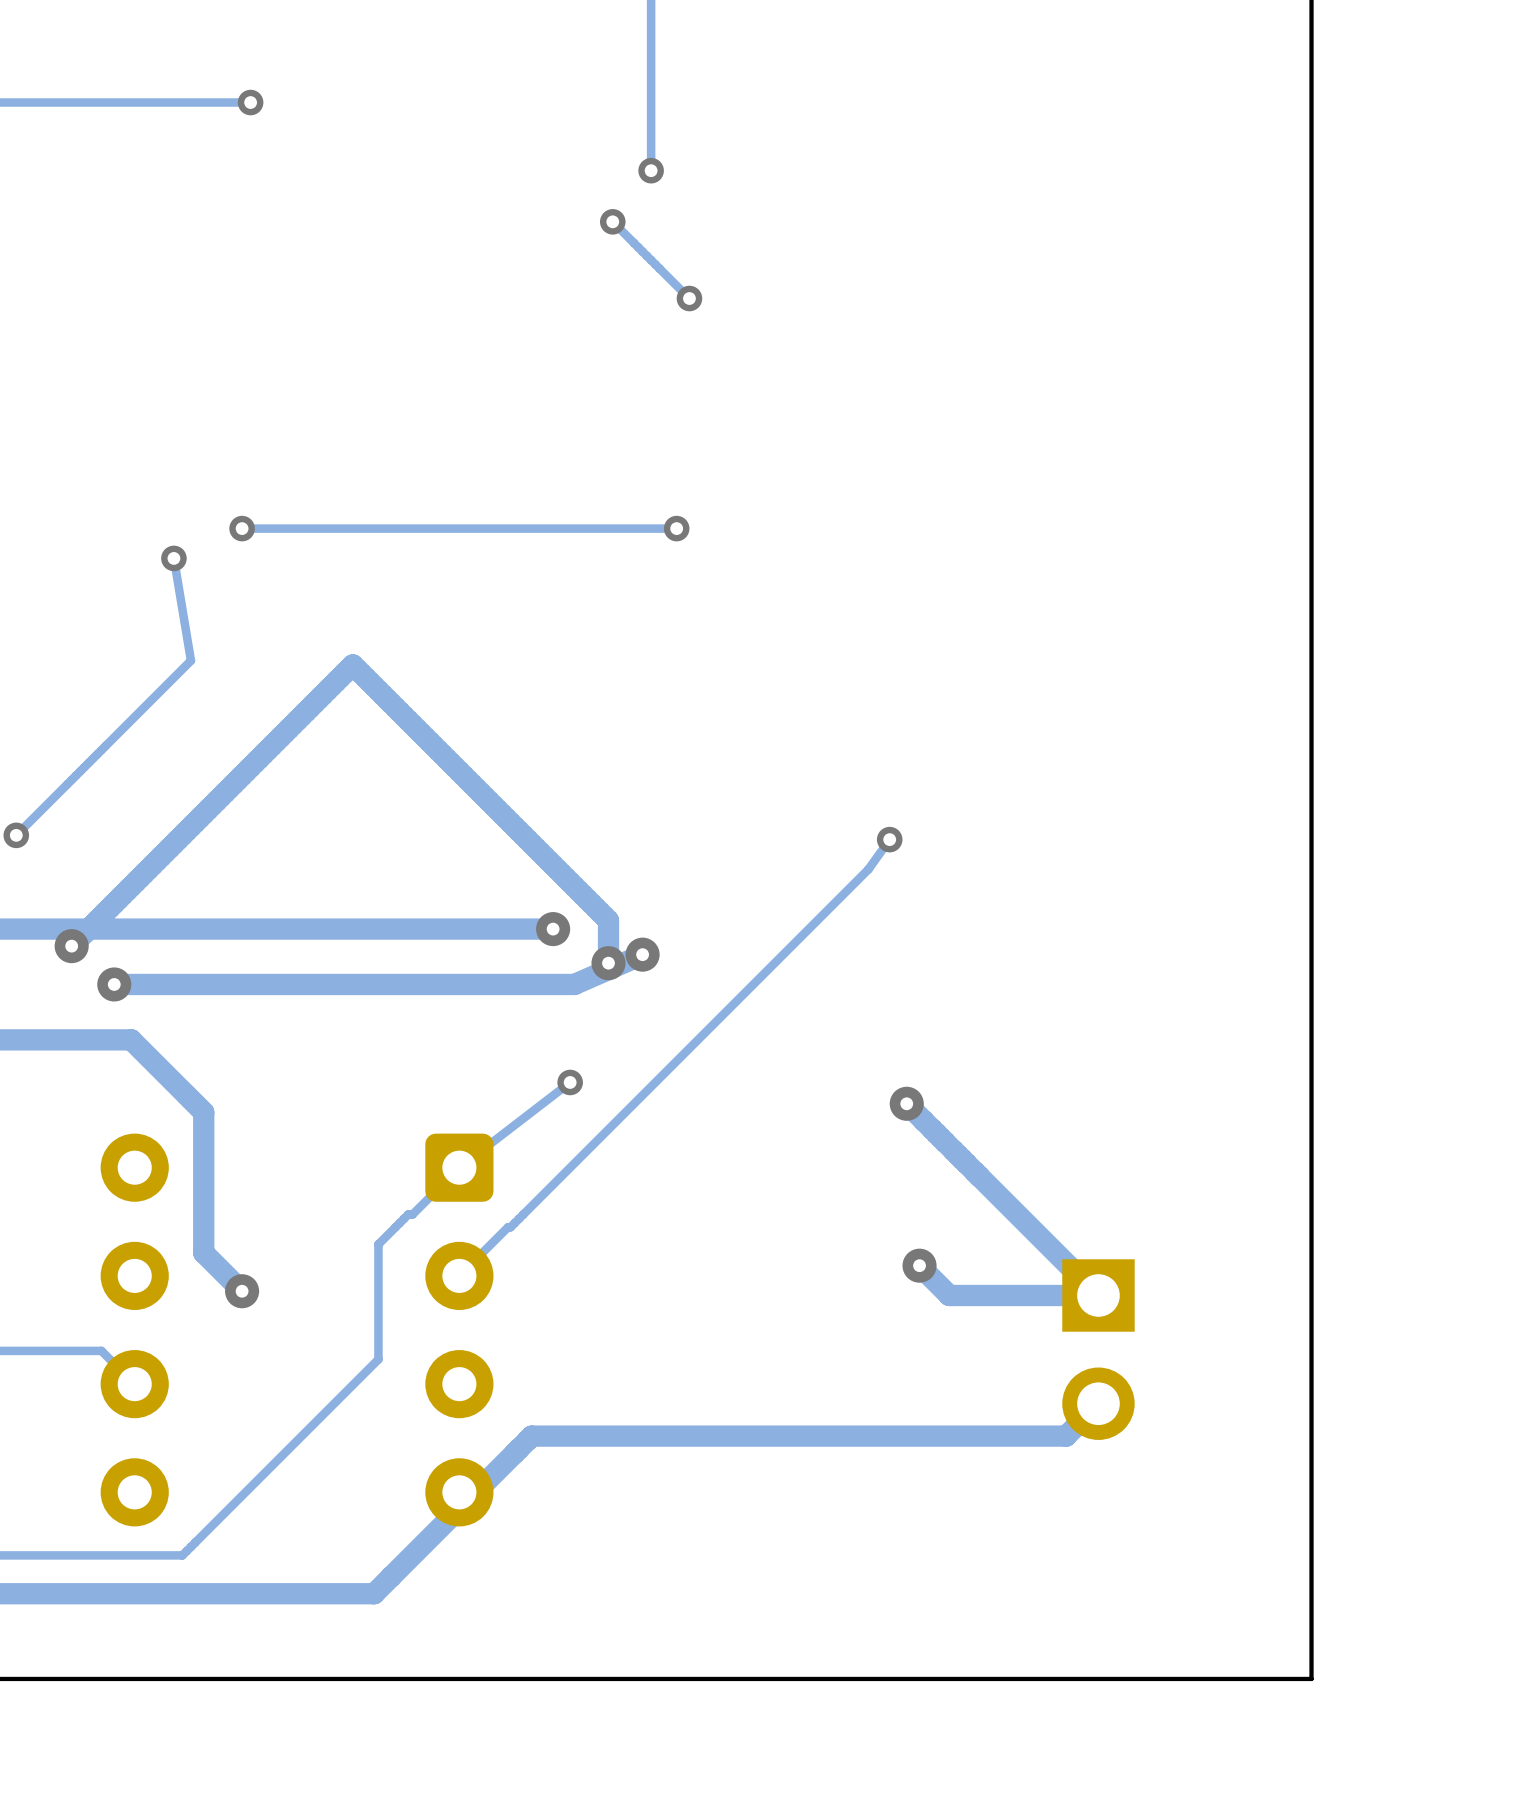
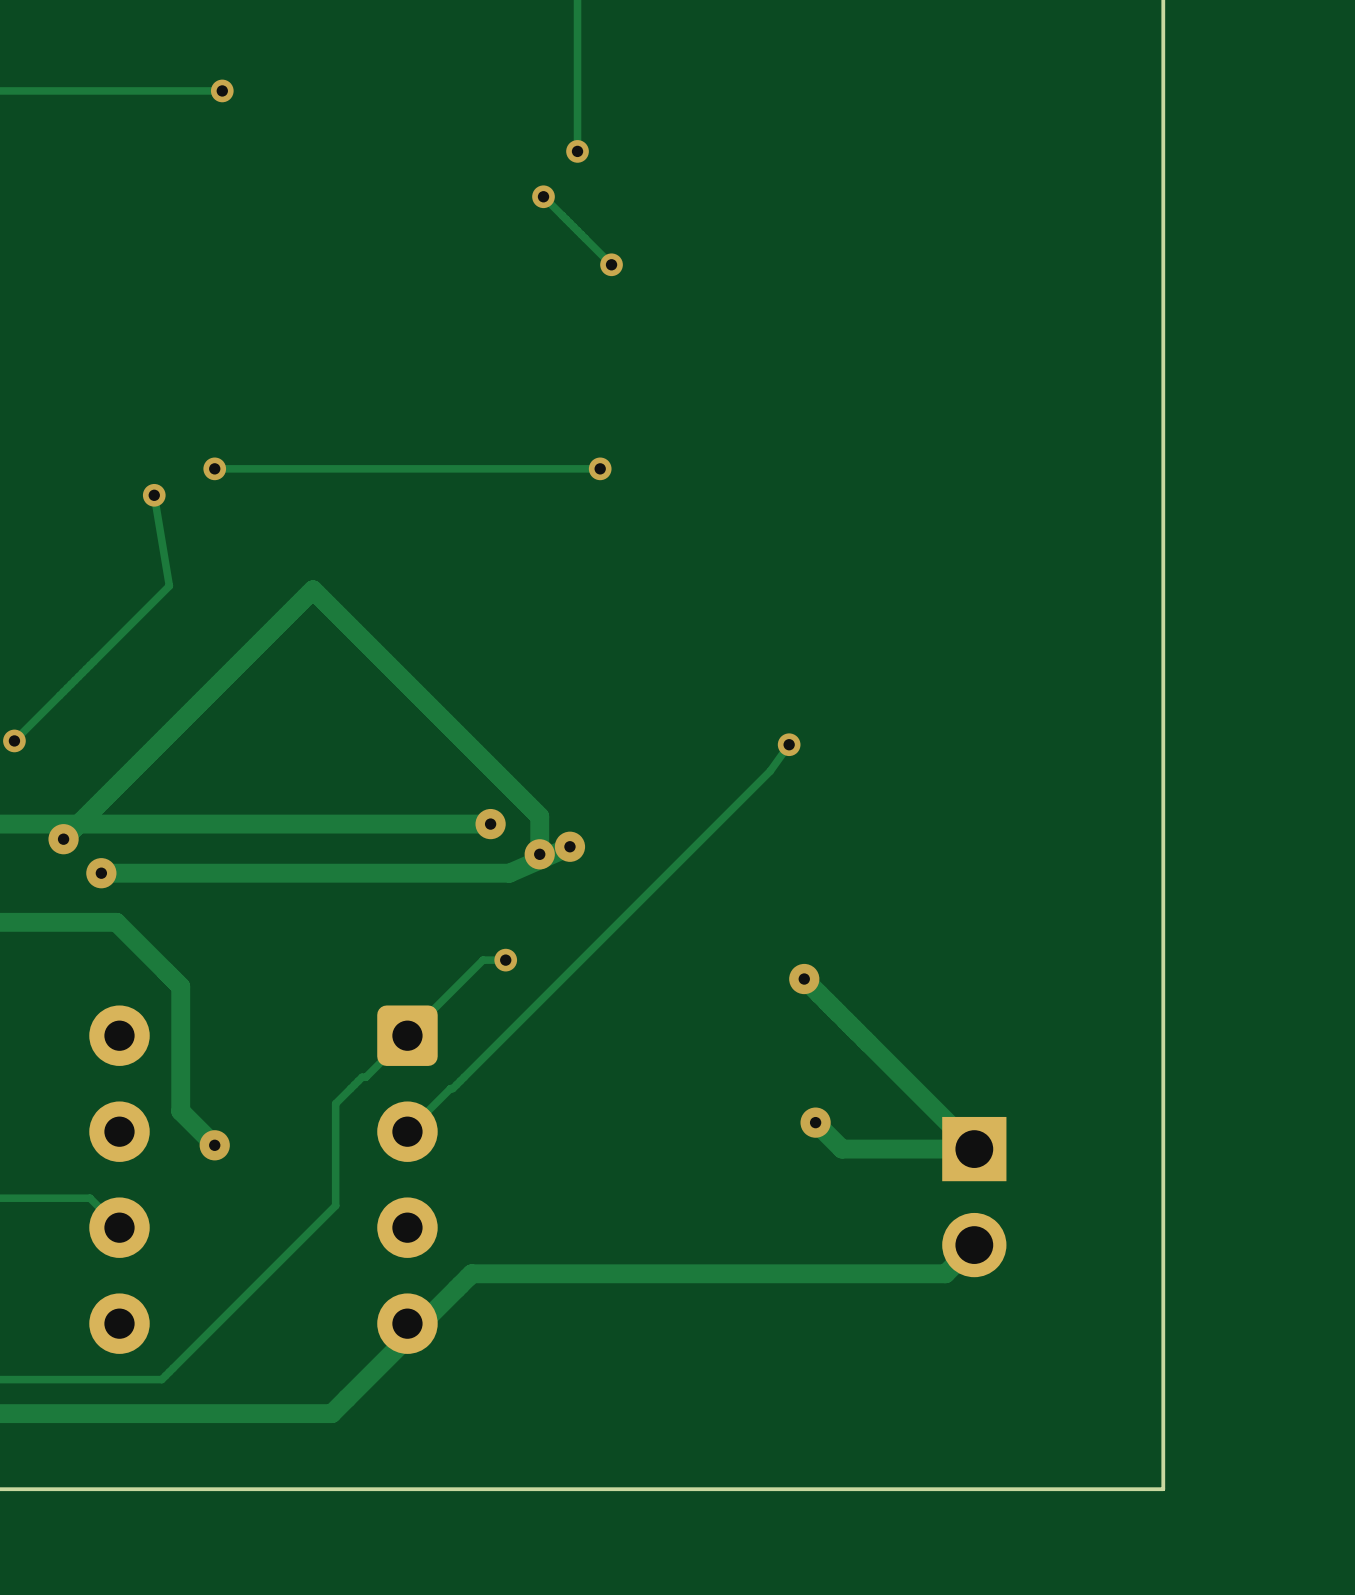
track: (570, 1082) (459, 1167) -> (505, 960) (483, 960) (407, 1035)

